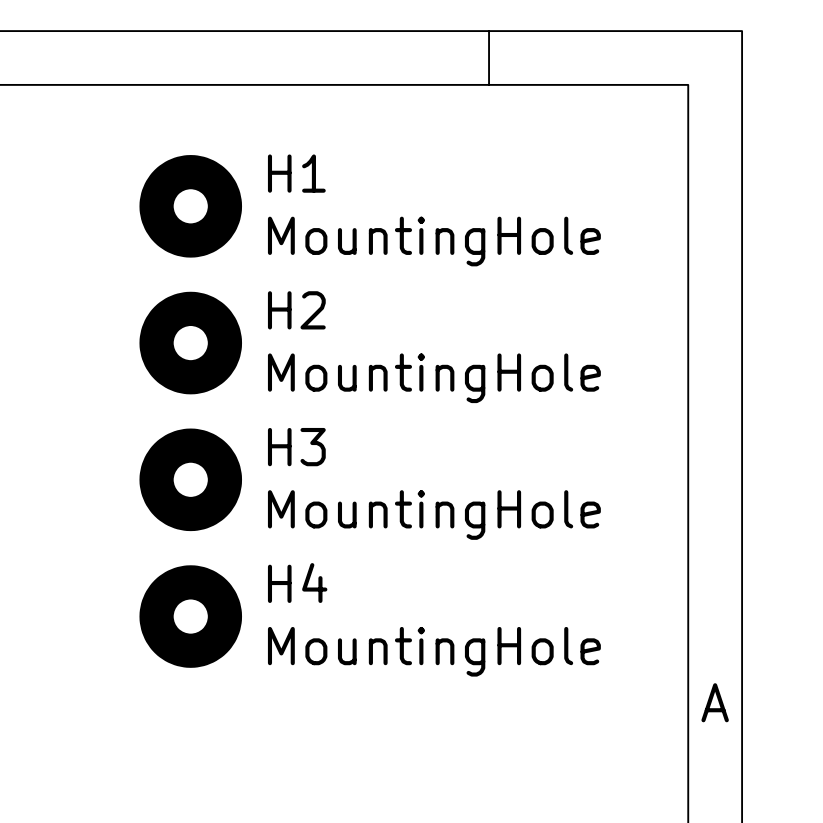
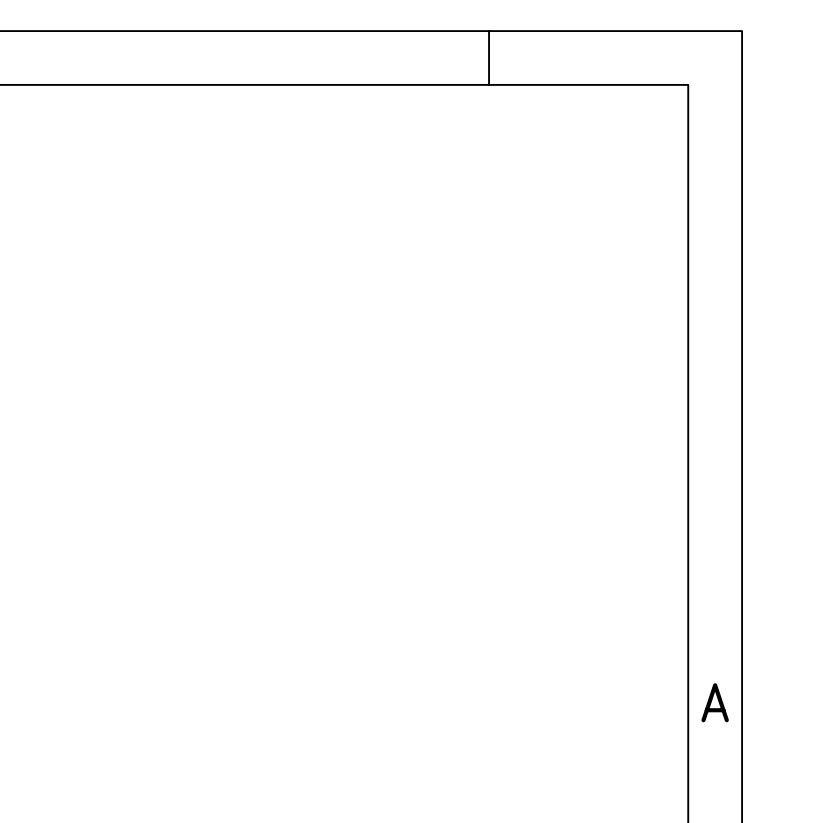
H1: MountingHole (190, 206) -> none
H2: MountingHole (190, 343) -> none
H3: MountingHole (190, 479) -> none
H4: MountingHole (190, 616) -> none

